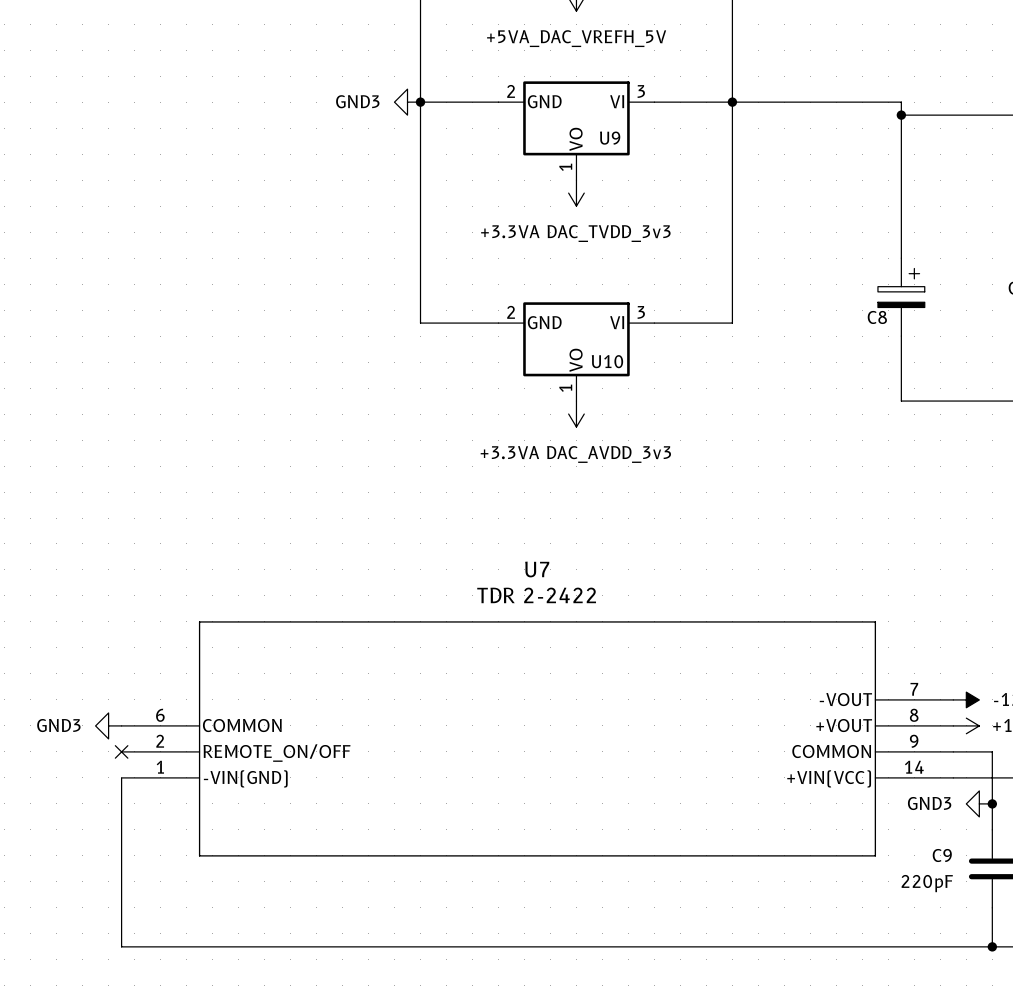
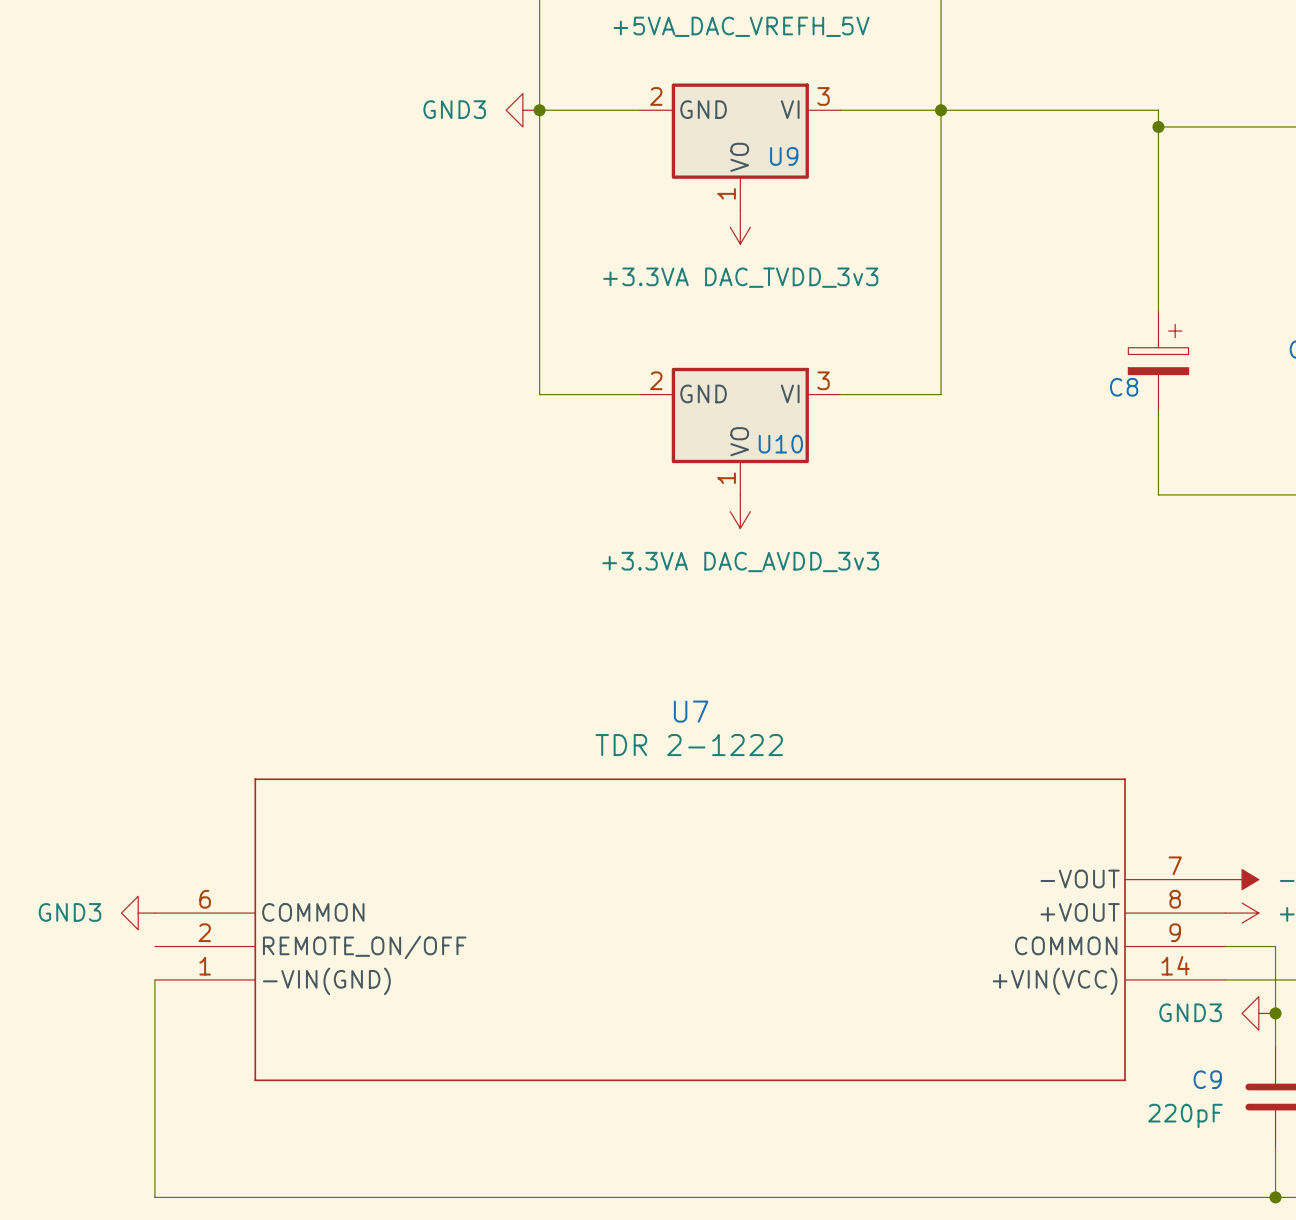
U7 value: TDR 2-2422 (536, 595) -> TDR 2-1222 (689, 745)
no-connect mark: (121, 751) -> none

